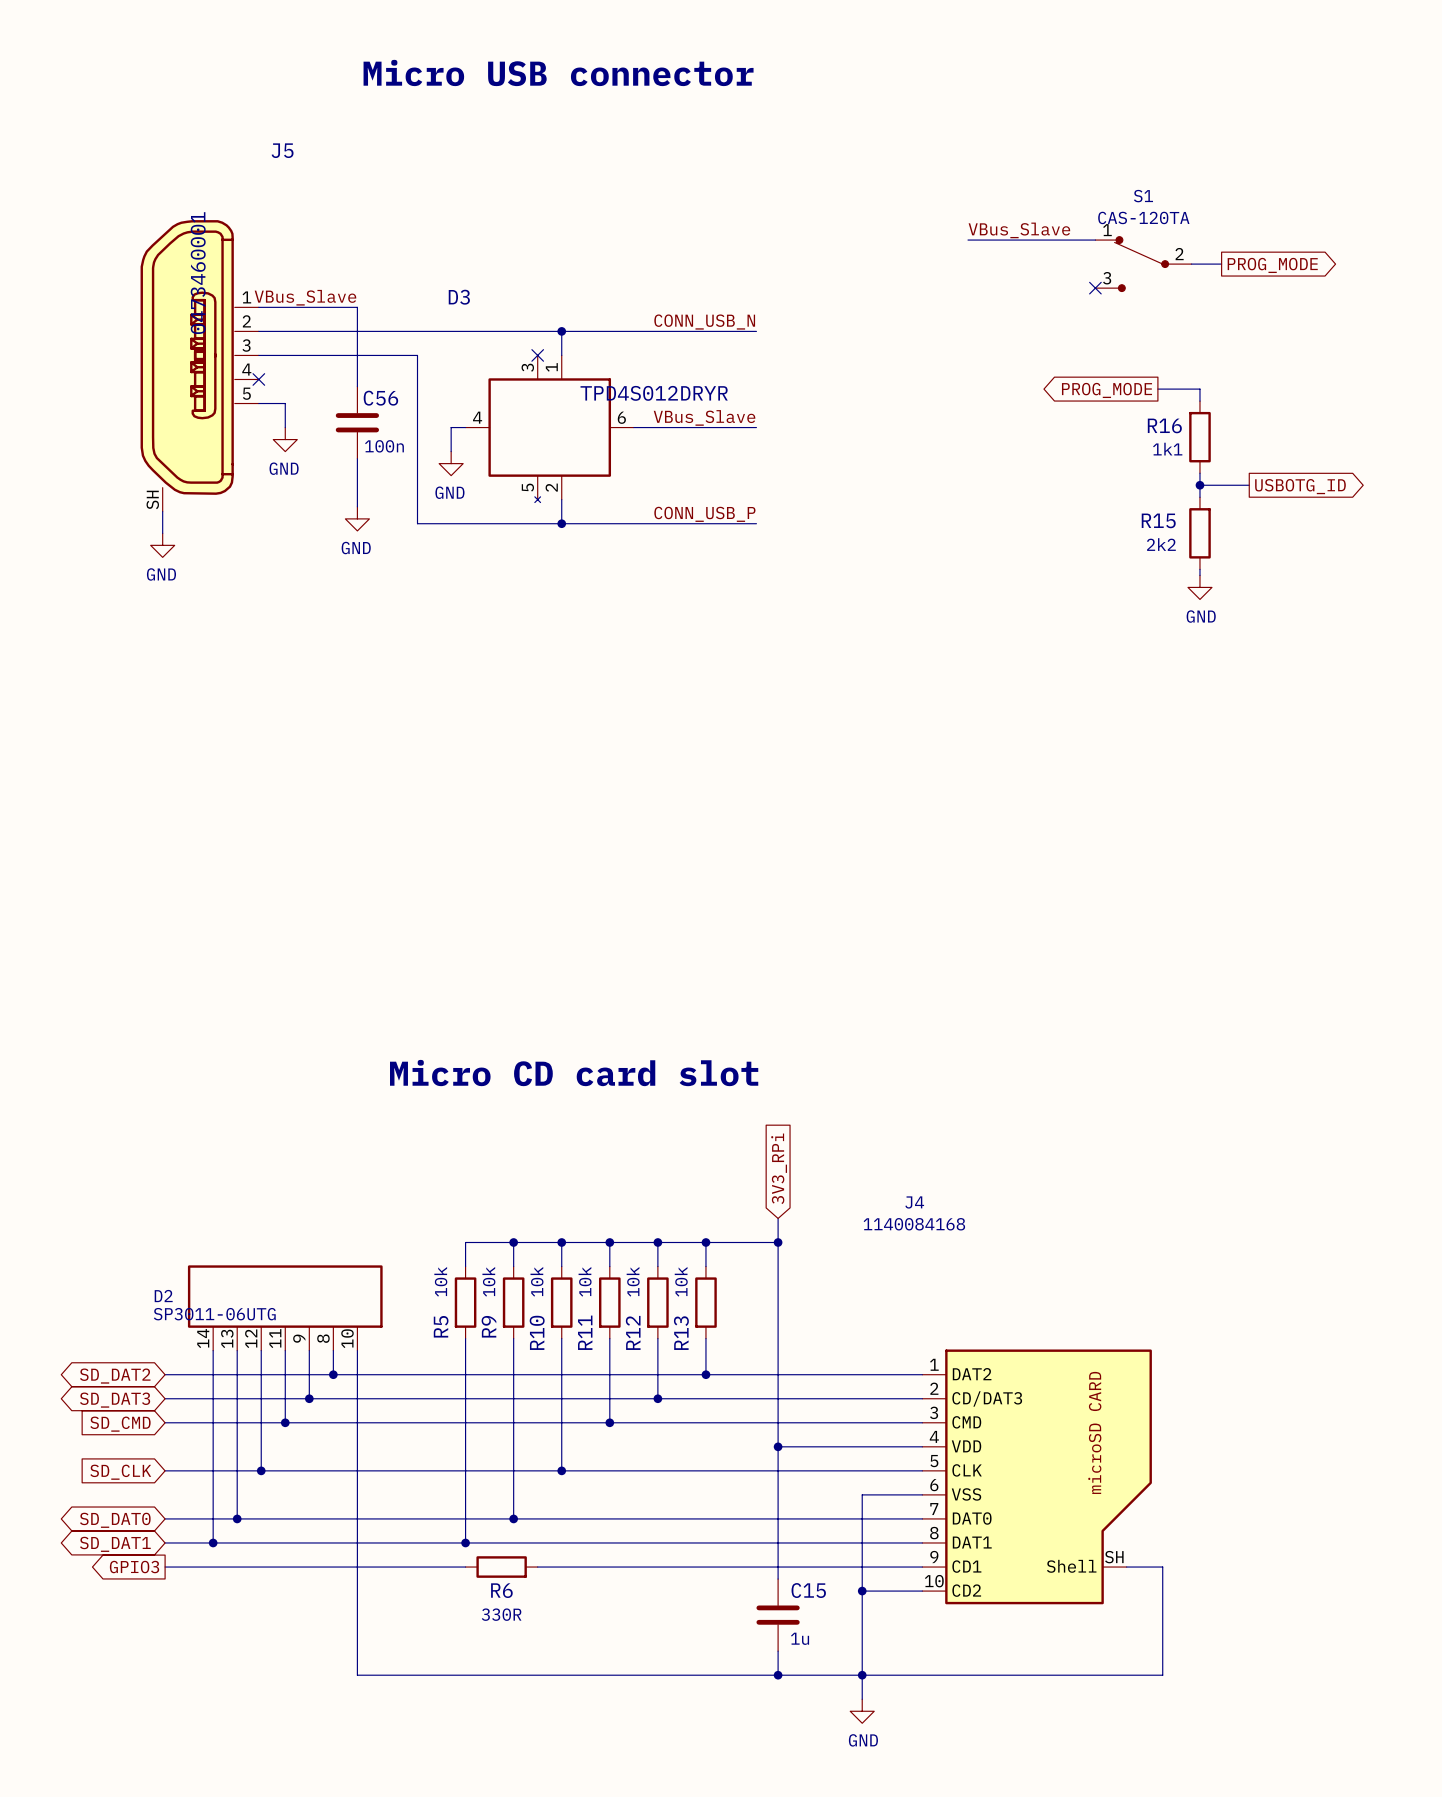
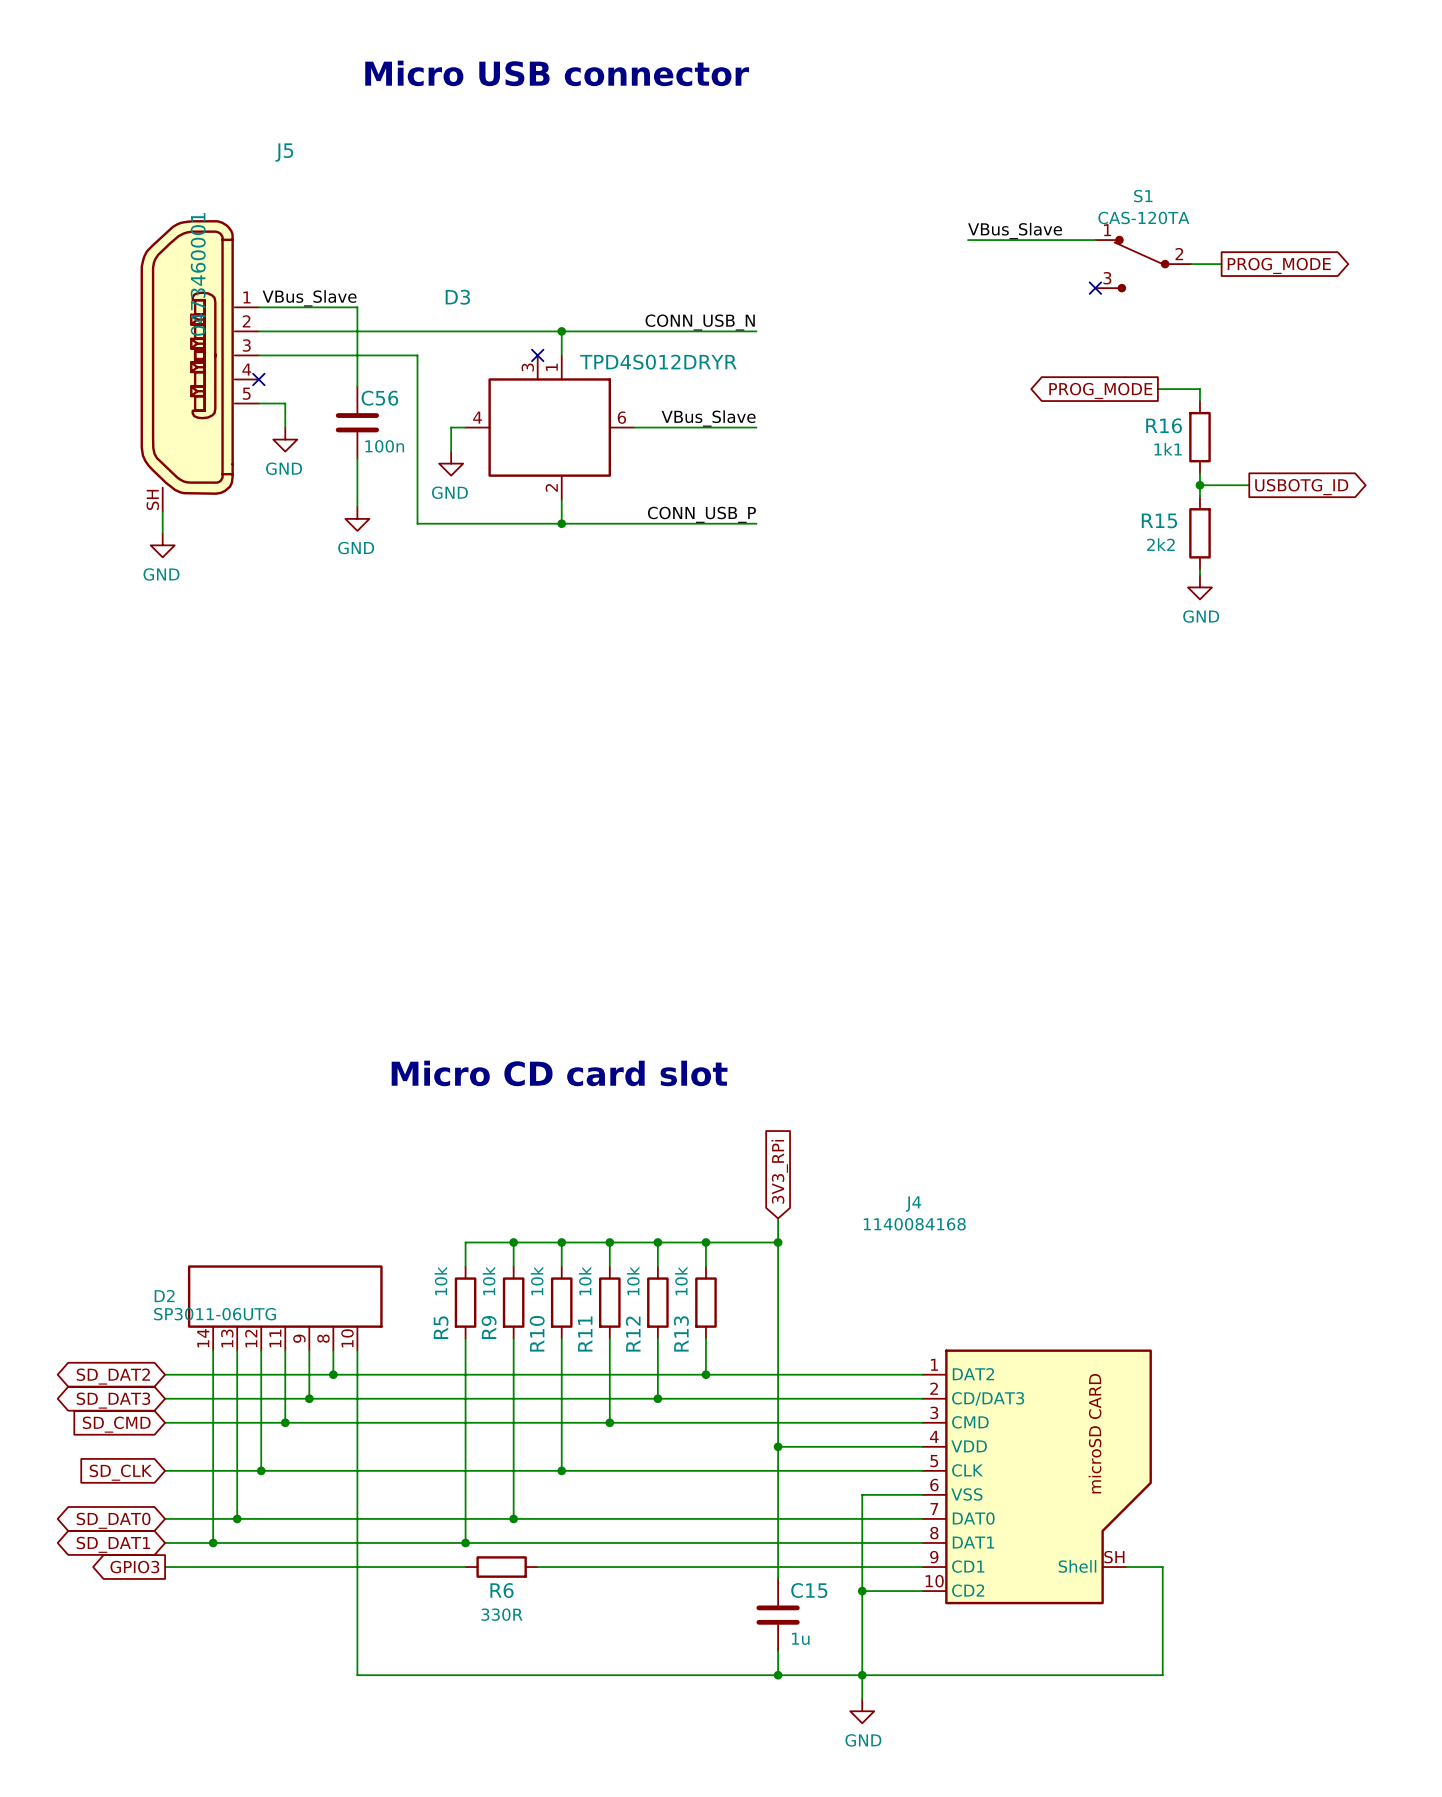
D3 symbol: [465, 355, 634, 503] -> [465, 355, 634, 500]
D3 value position: TPD4S012DRYR (654, 393) -> TPD4S012DRYR (658, 362)

